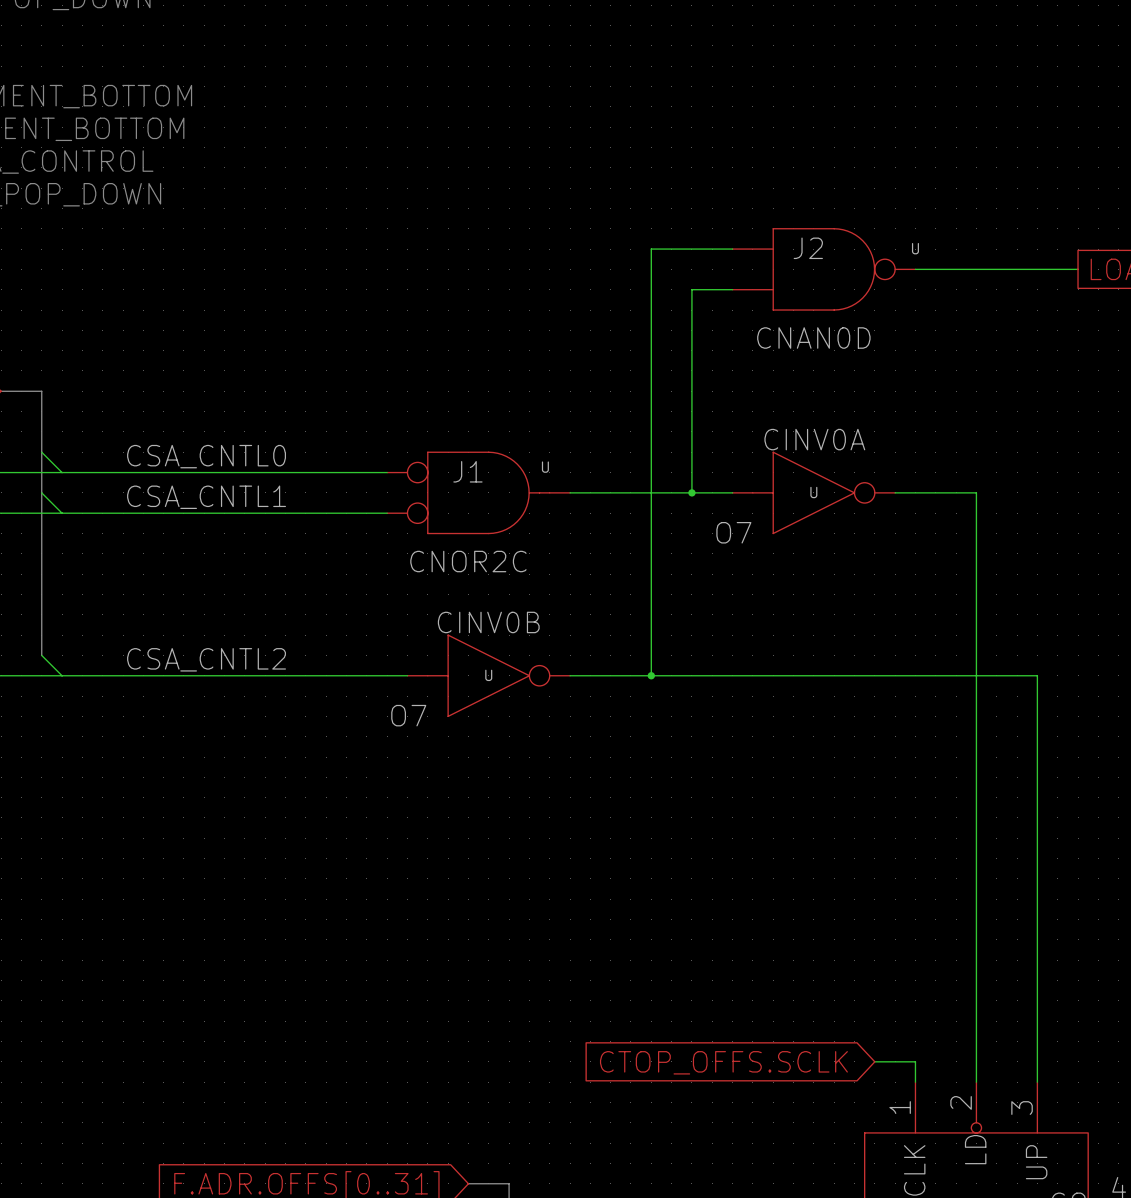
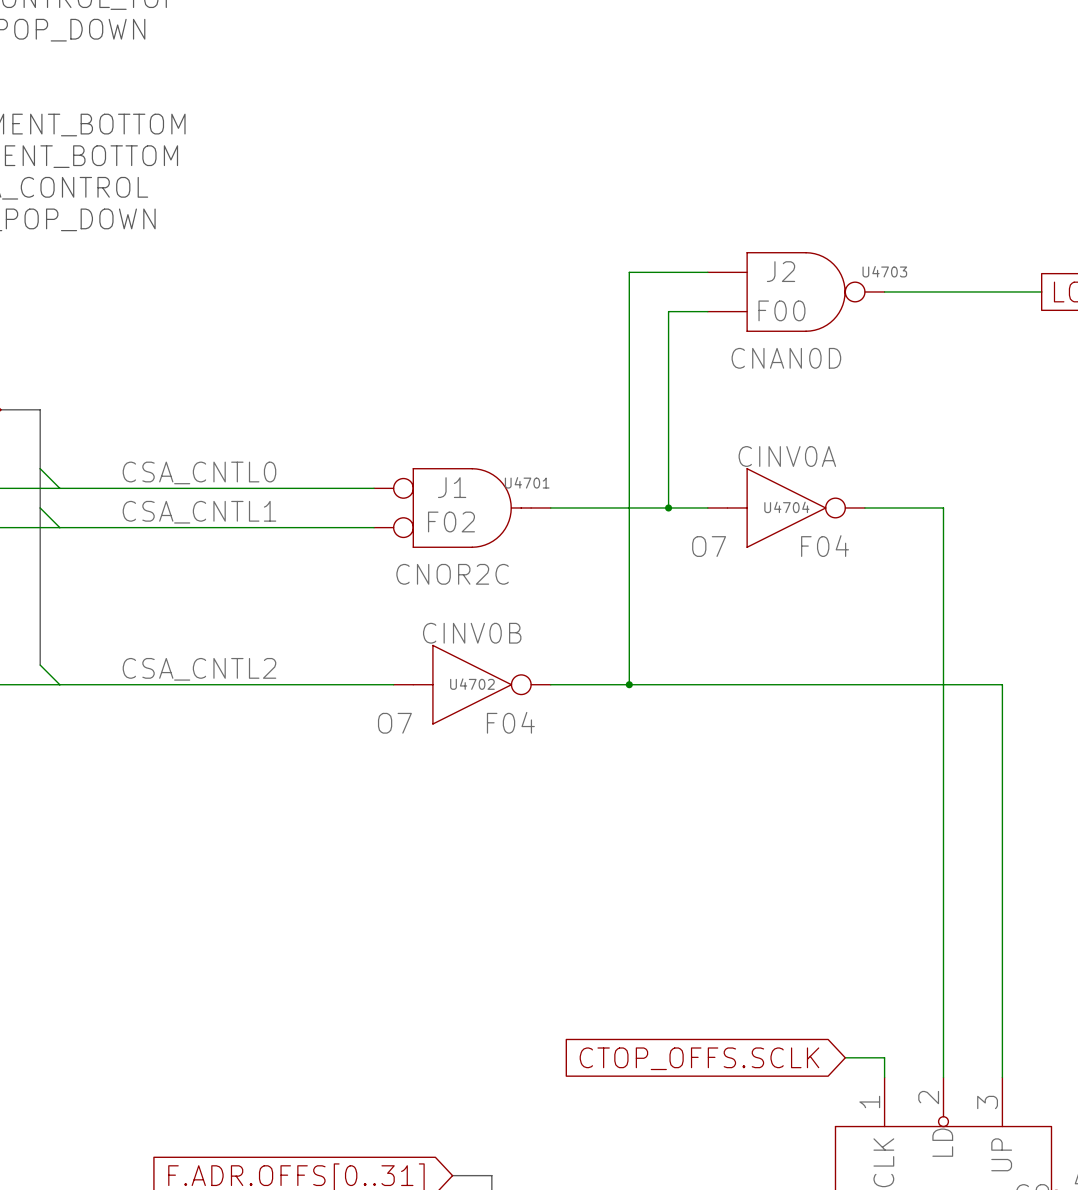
U name: U (915, 248) -> U4703 (884, 271)
U value: none -> F00 (781, 310)
U name: U (545, 467) -> U4701 (527, 482)
U name: U (813, 492) -> U4704 (786, 507)
U value: none -> F02 (451, 521)
U value: none -> F04 (825, 546)
U name: U (488, 675) -> U4702 (472, 684)
U value: none -> F04 (510, 722)

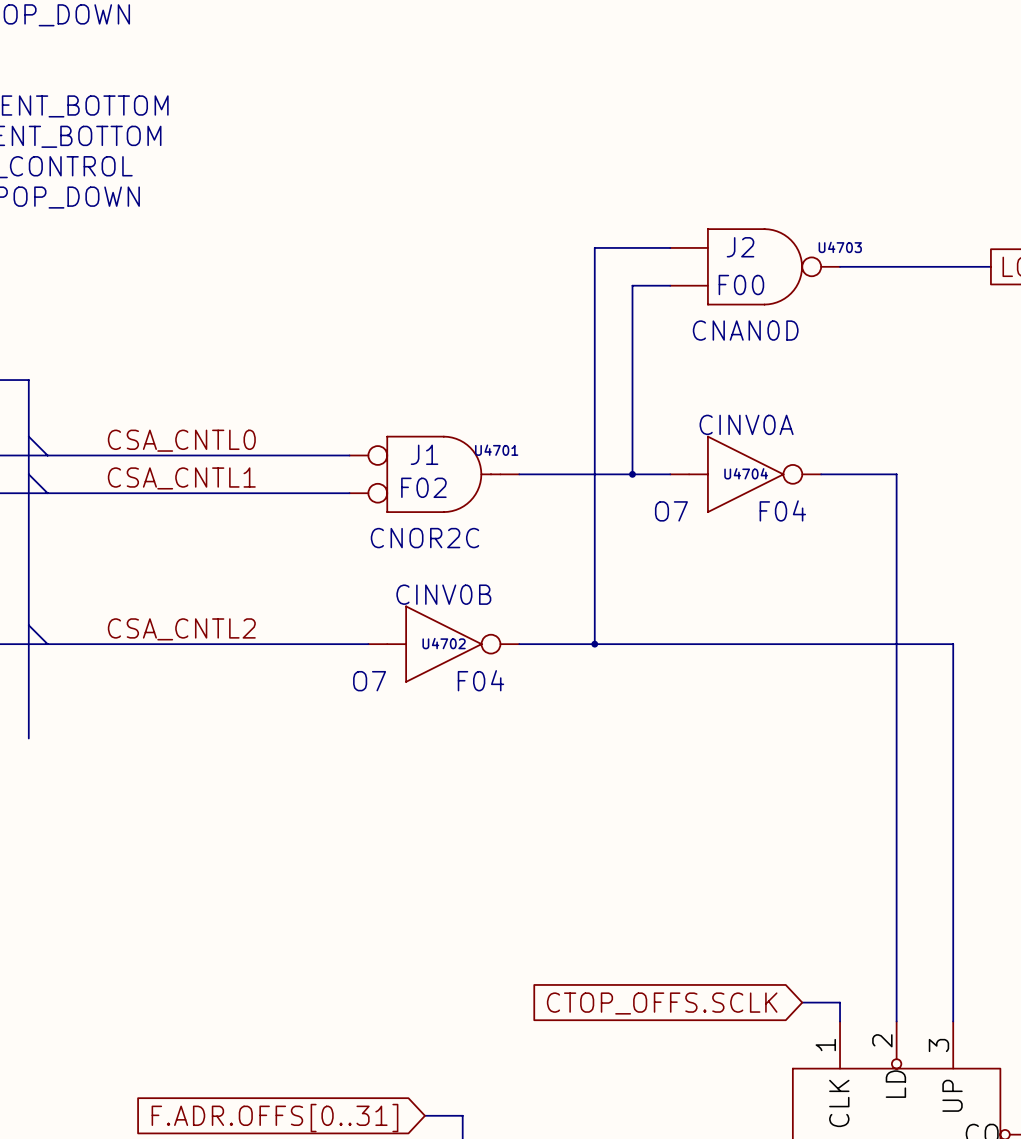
bus: none -> (28, 625) (28, 738)

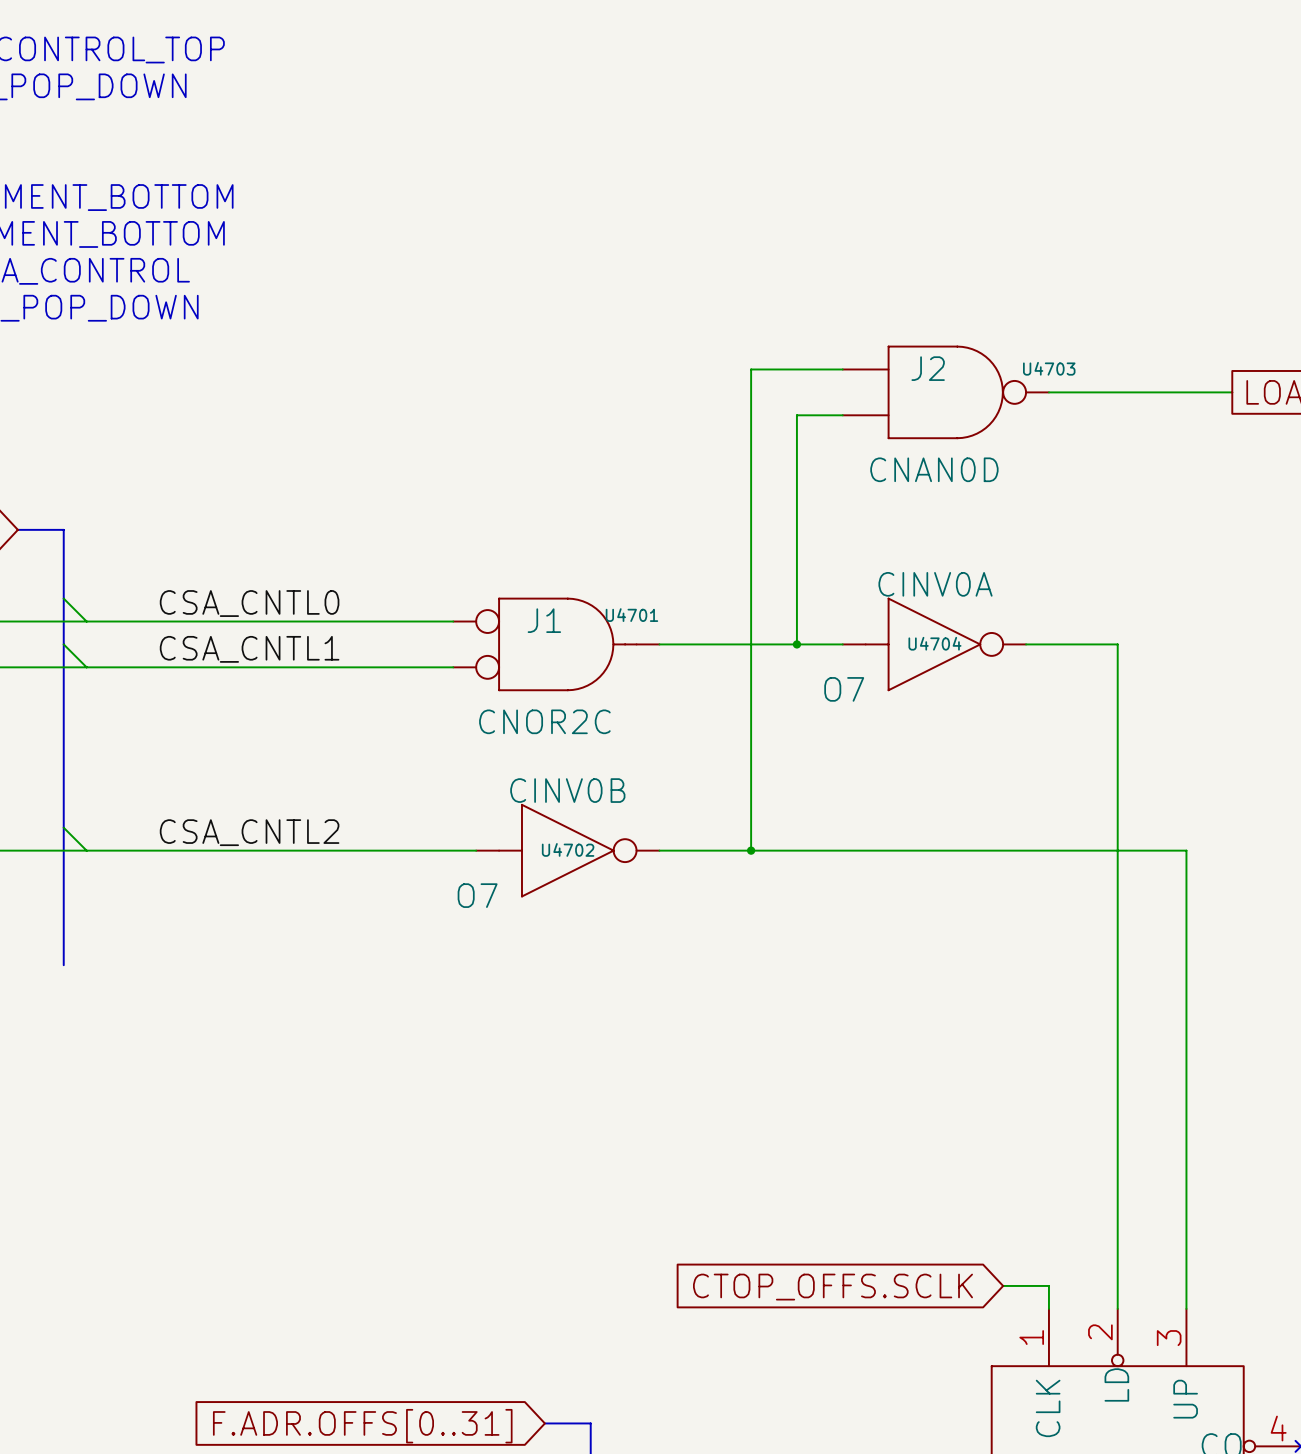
U4703 value: F00 (741, 284) -> none
U4701 value: F02 (423, 487) -> none
U4704 value: F04 (782, 510) -> none
U4702 value: F04 (480, 680) -> none

